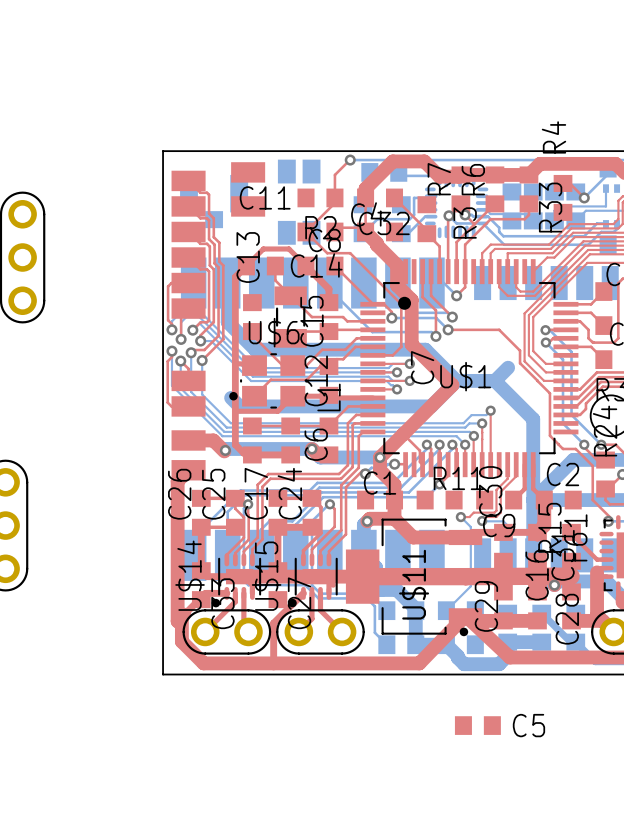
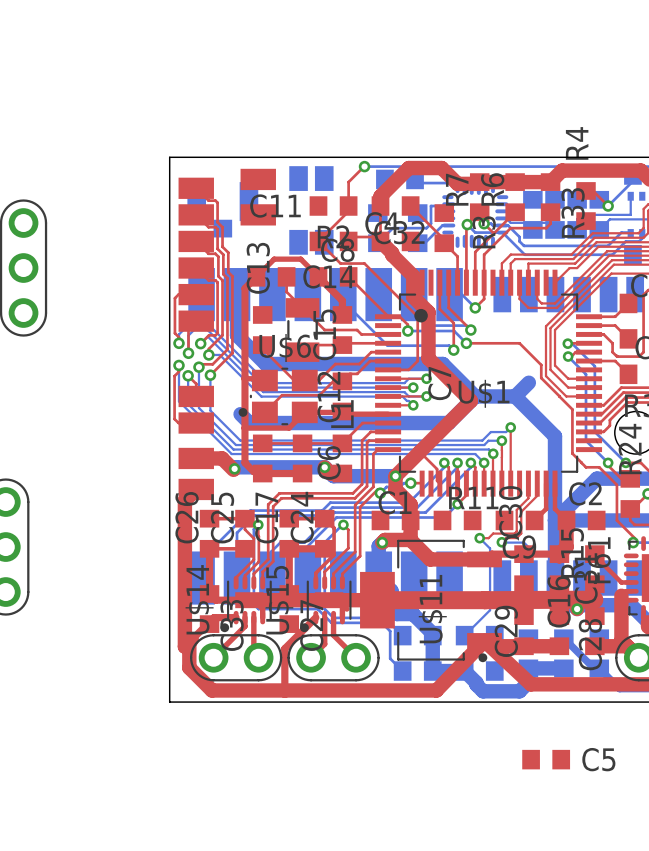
C5 position: (477, 725) -> (546, 759)

